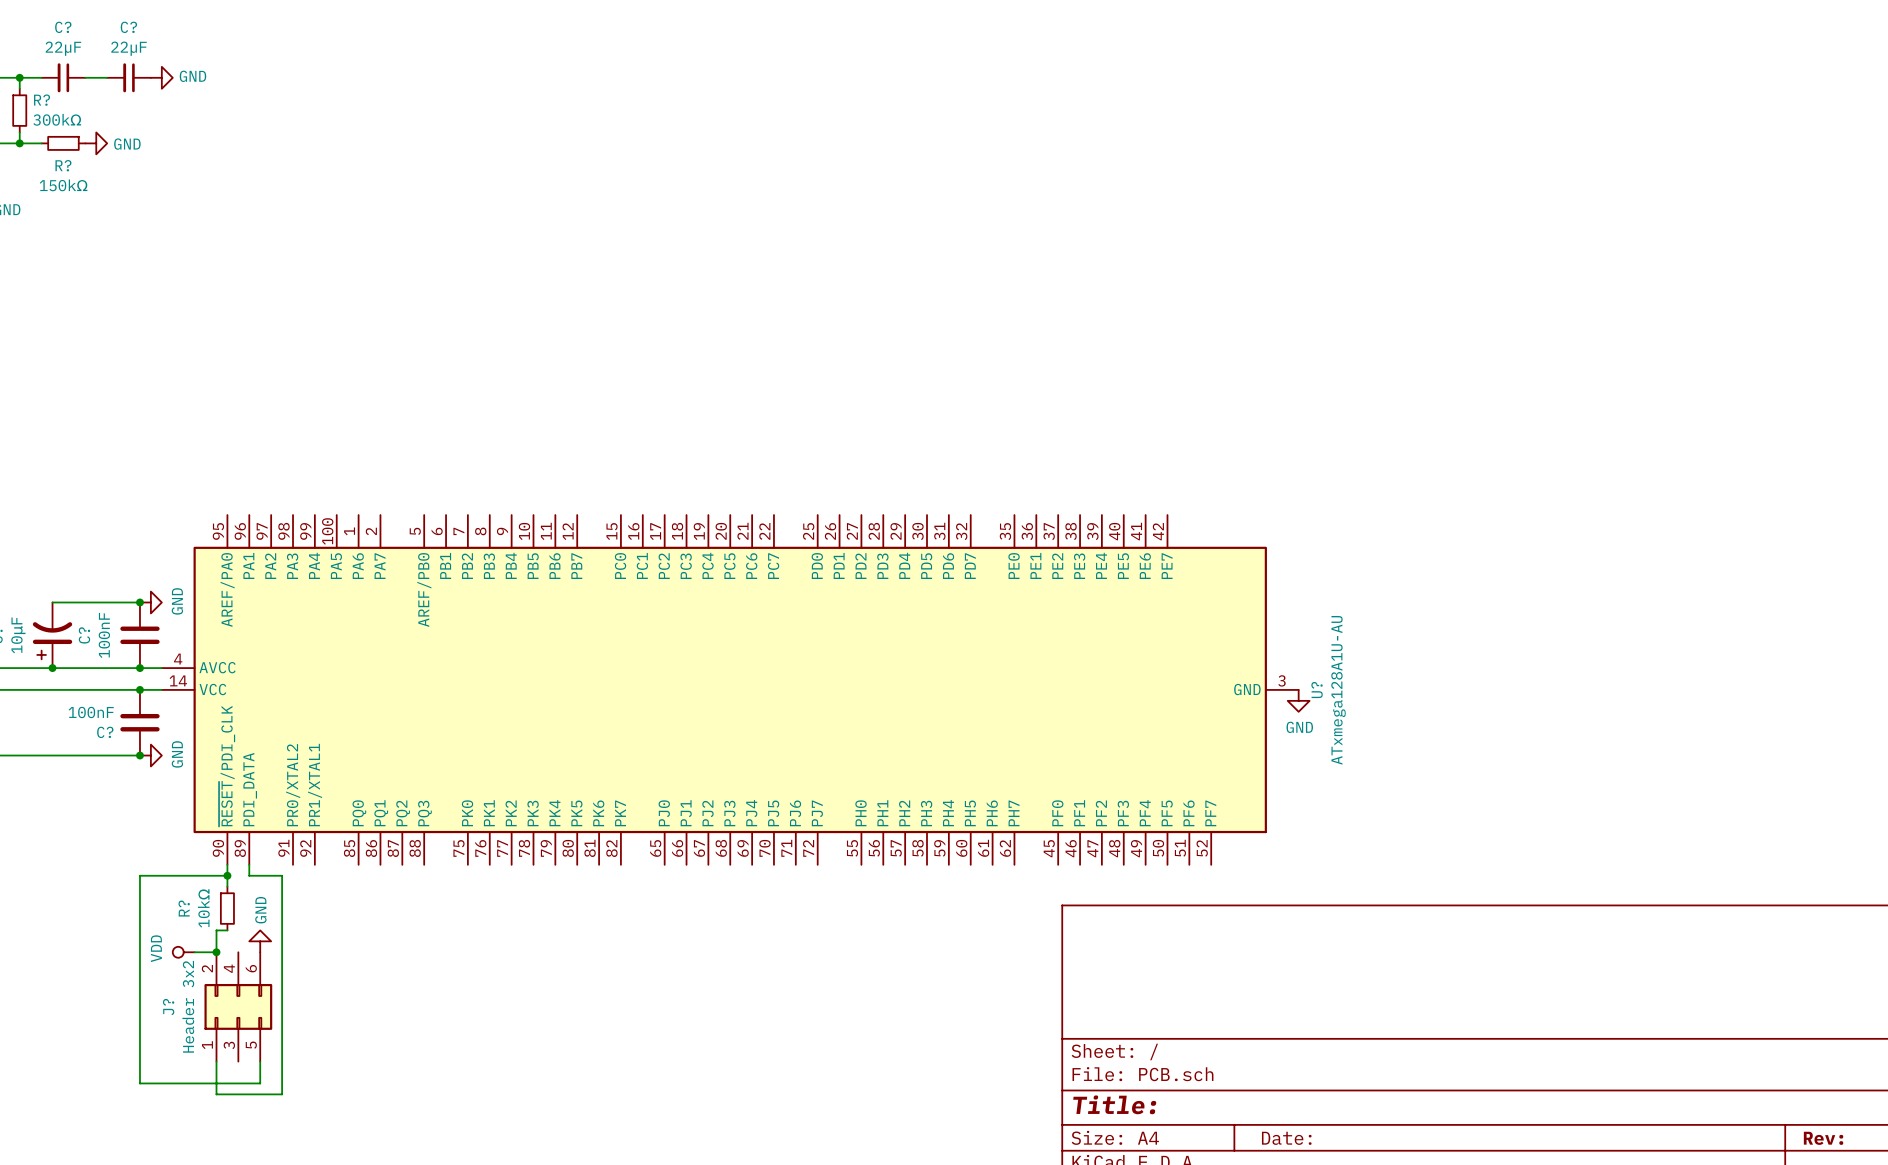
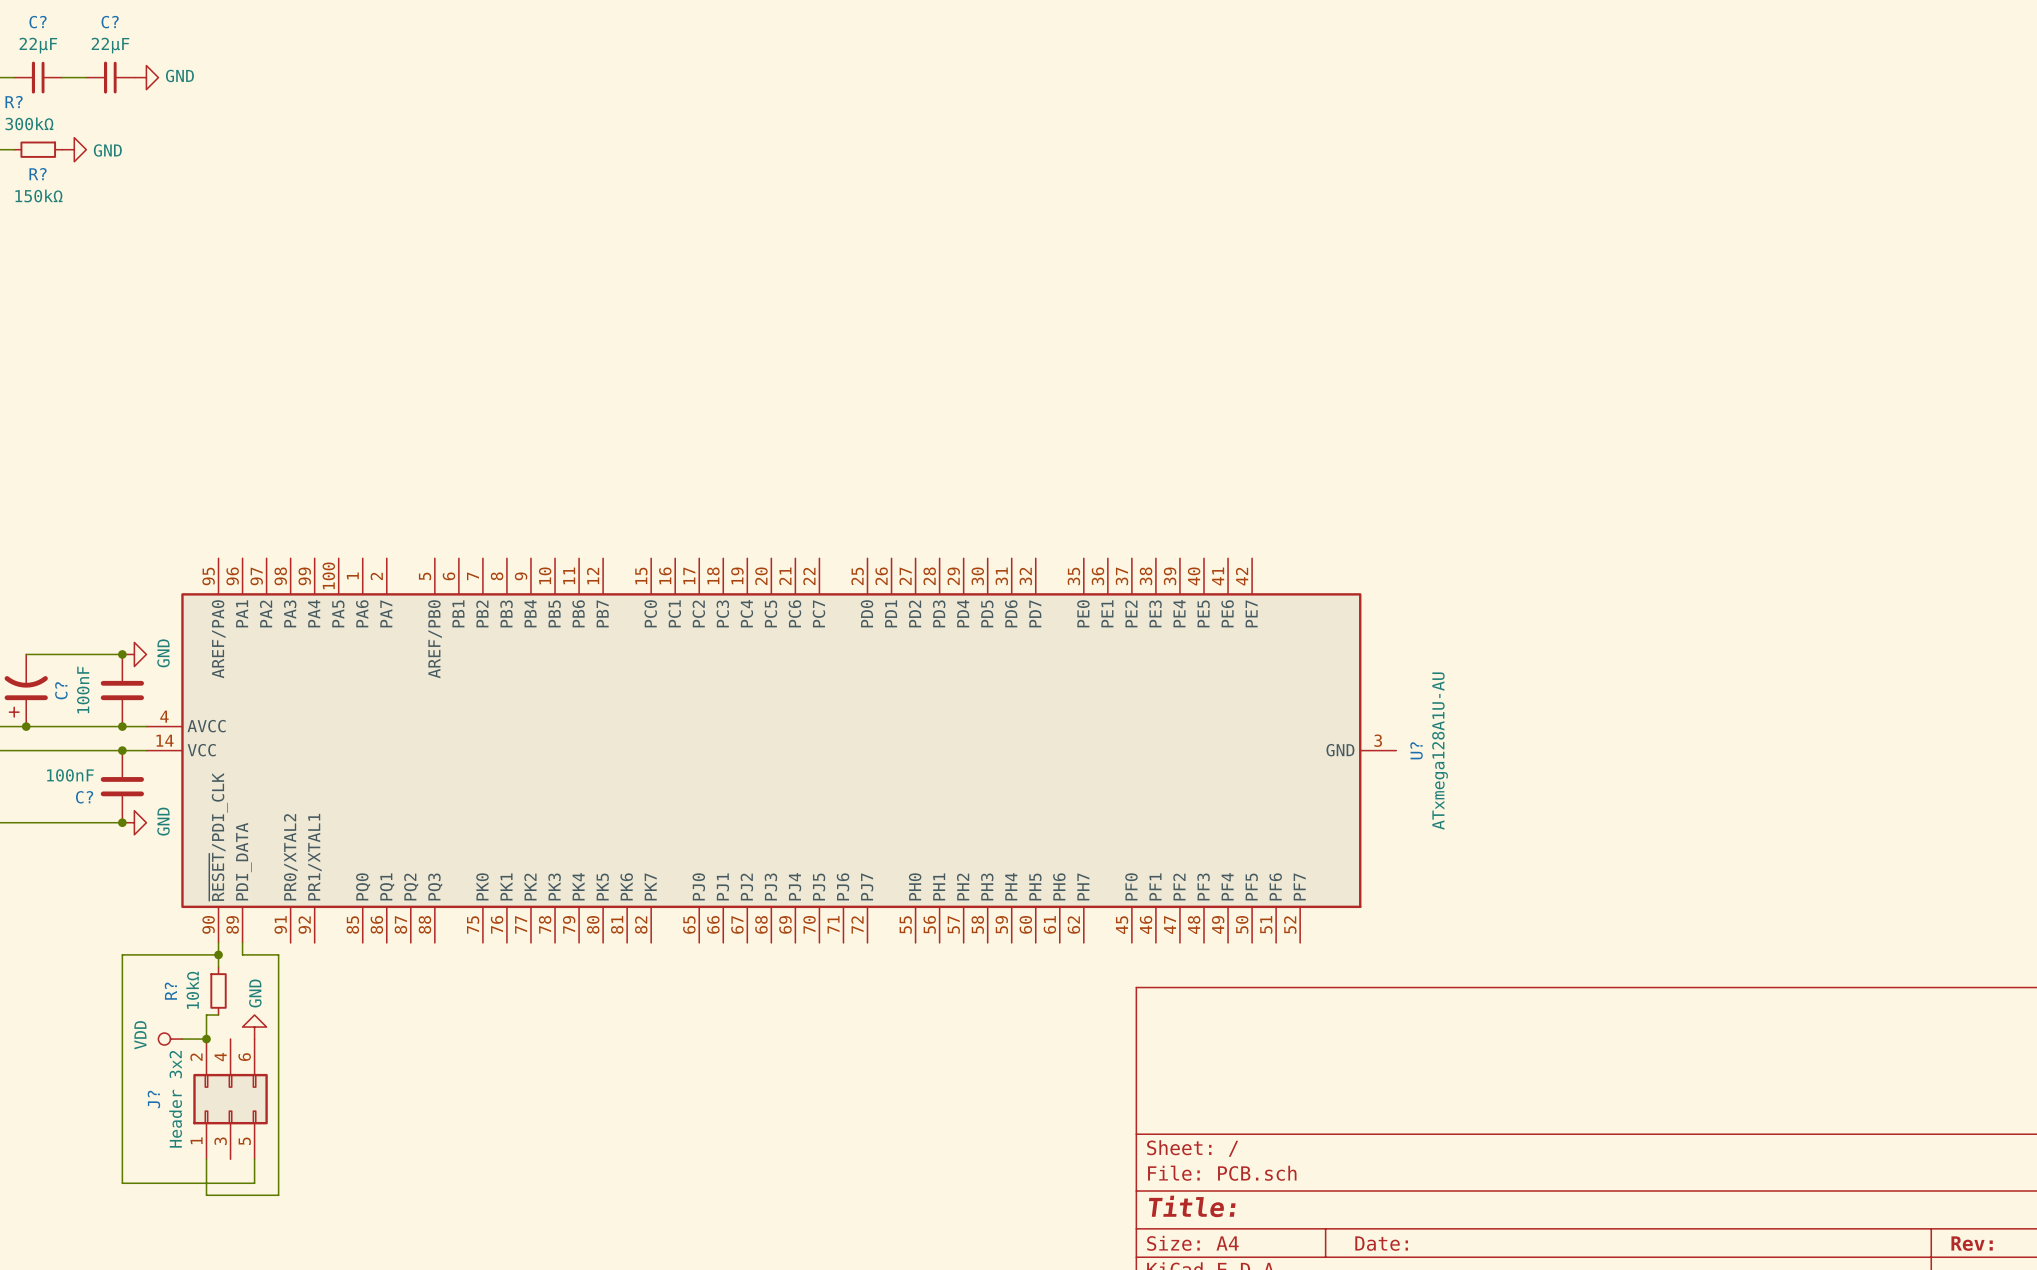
power symbol: GND (1298, 700) -> none

